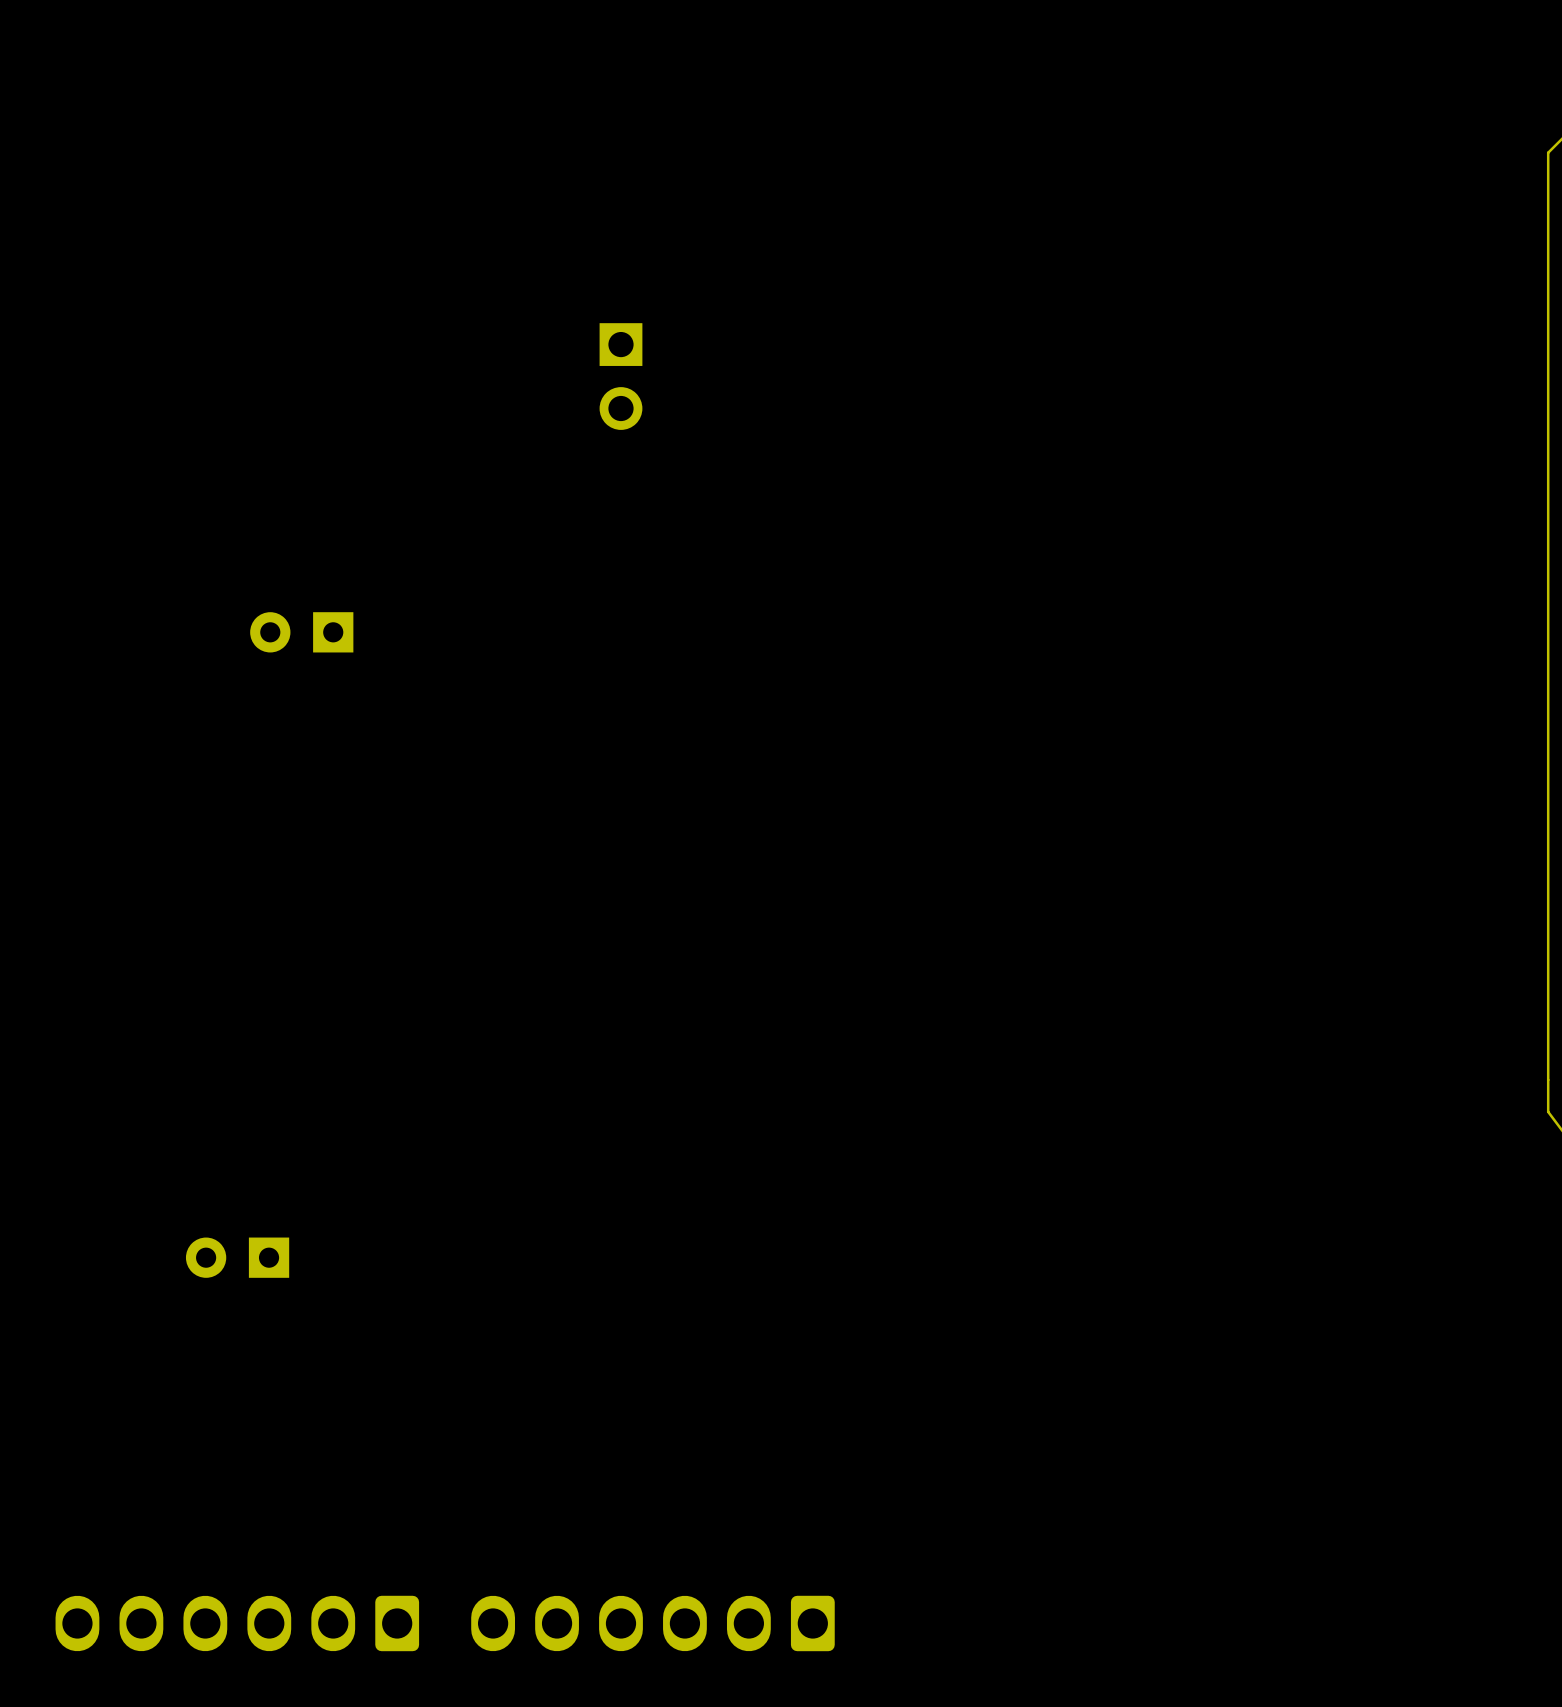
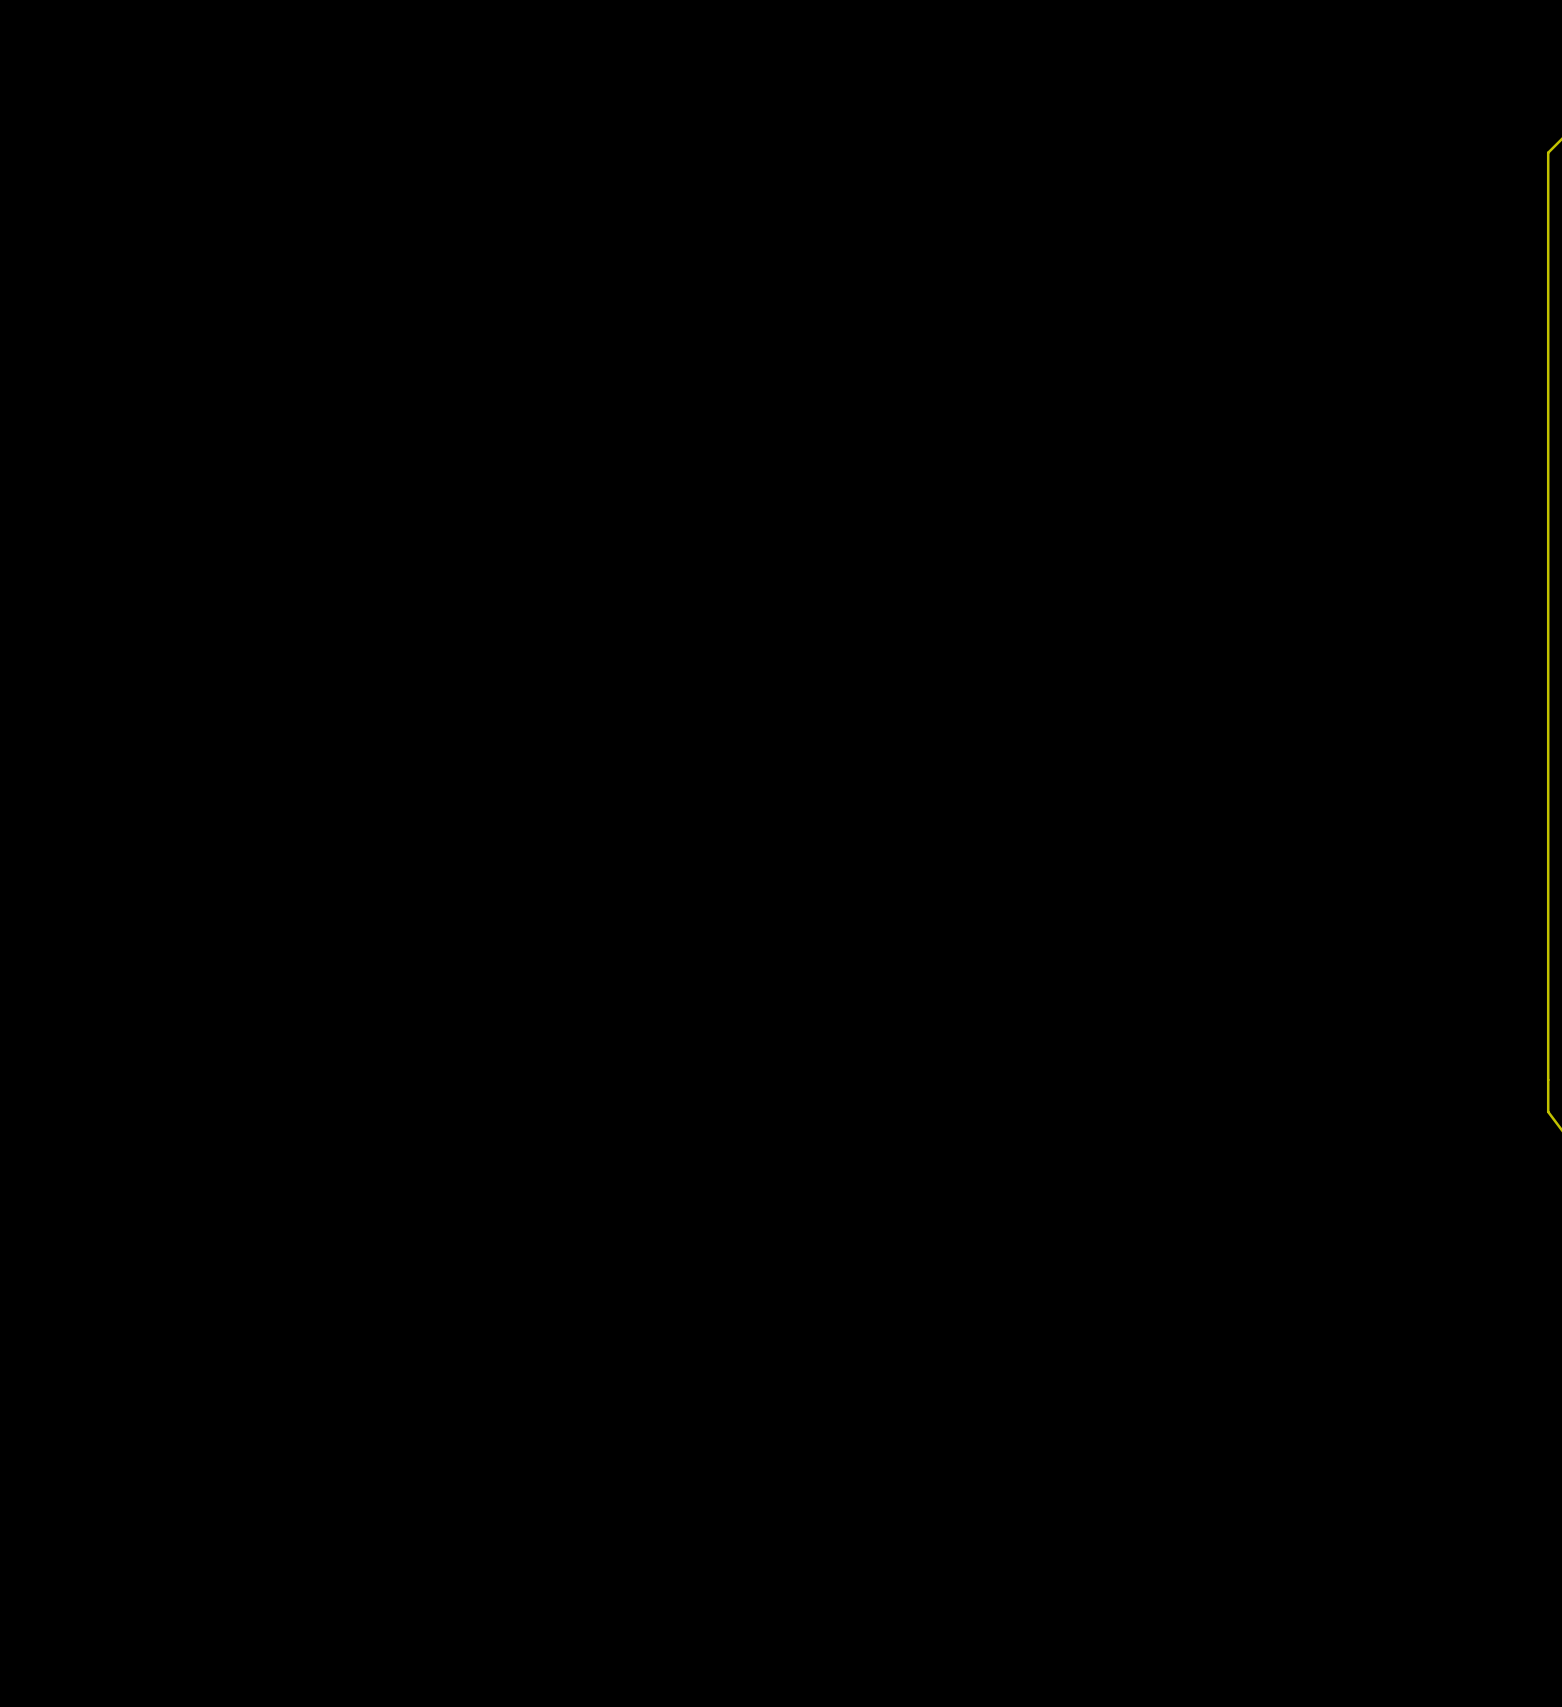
part: (620, 376) -> none
part: (301, 632) -> none
part: (237, 1257) -> none
part: (237, 1623) -> none
part: (652, 1623) -> none

